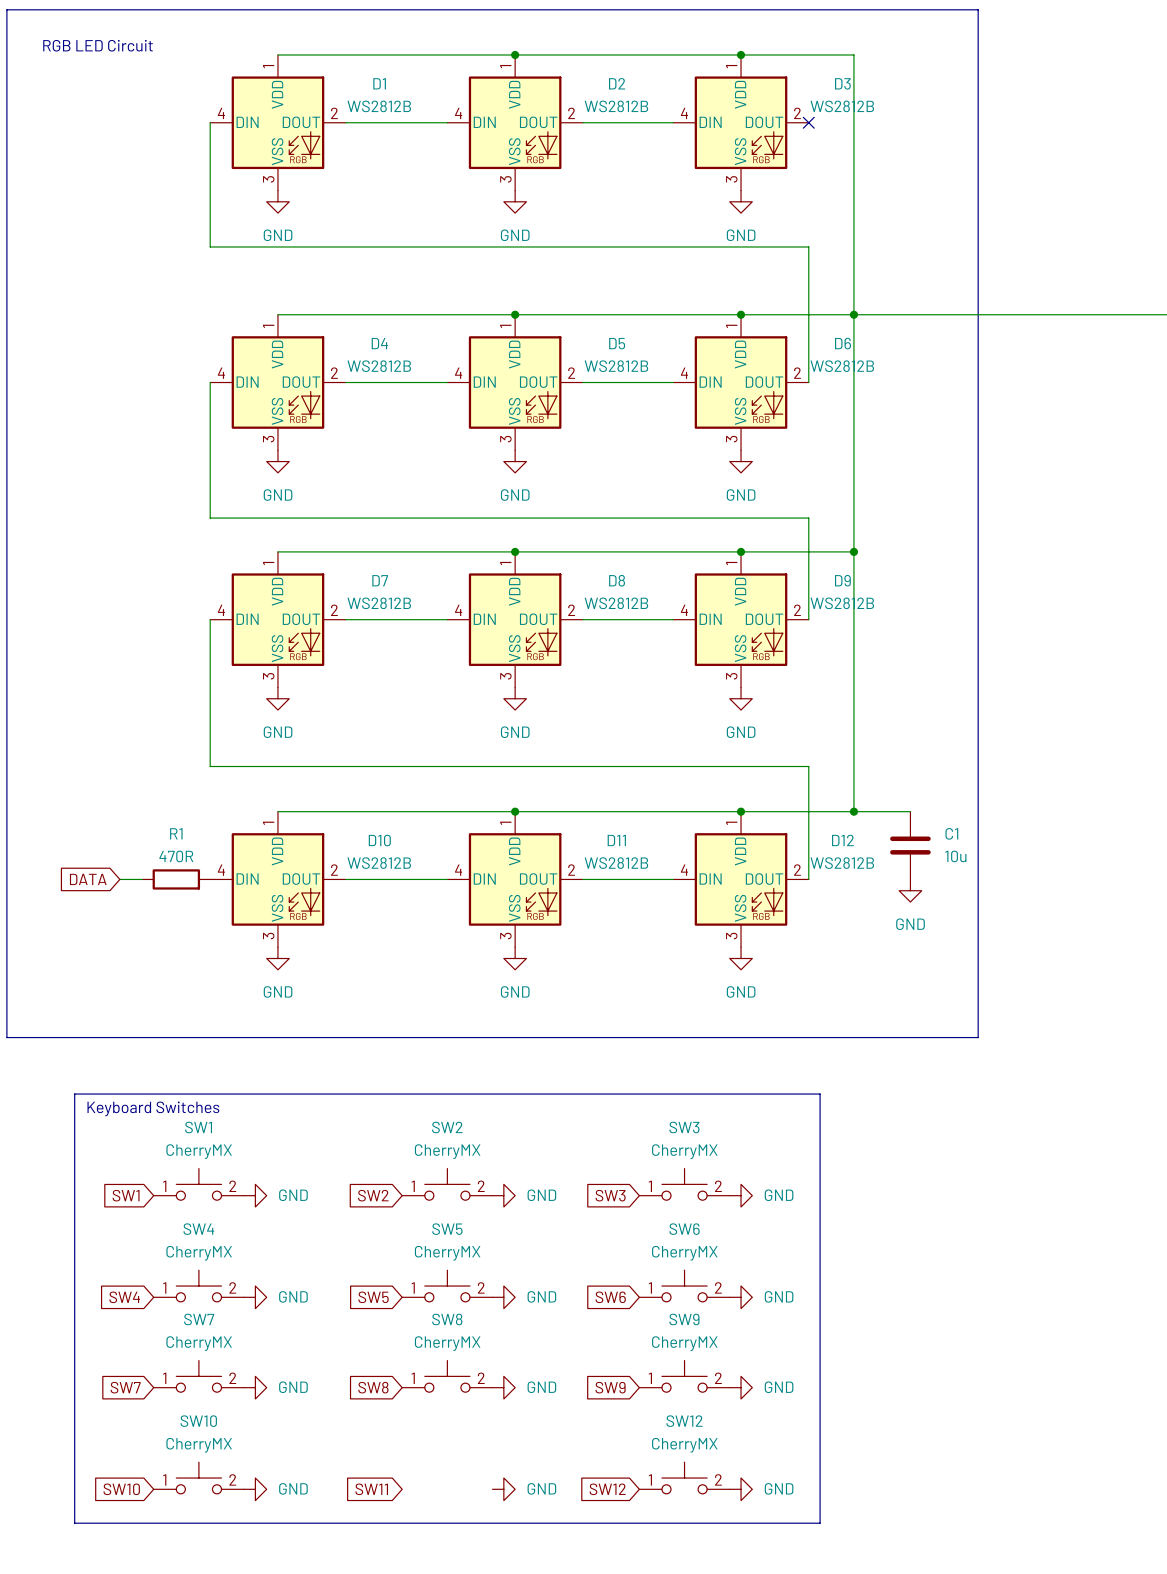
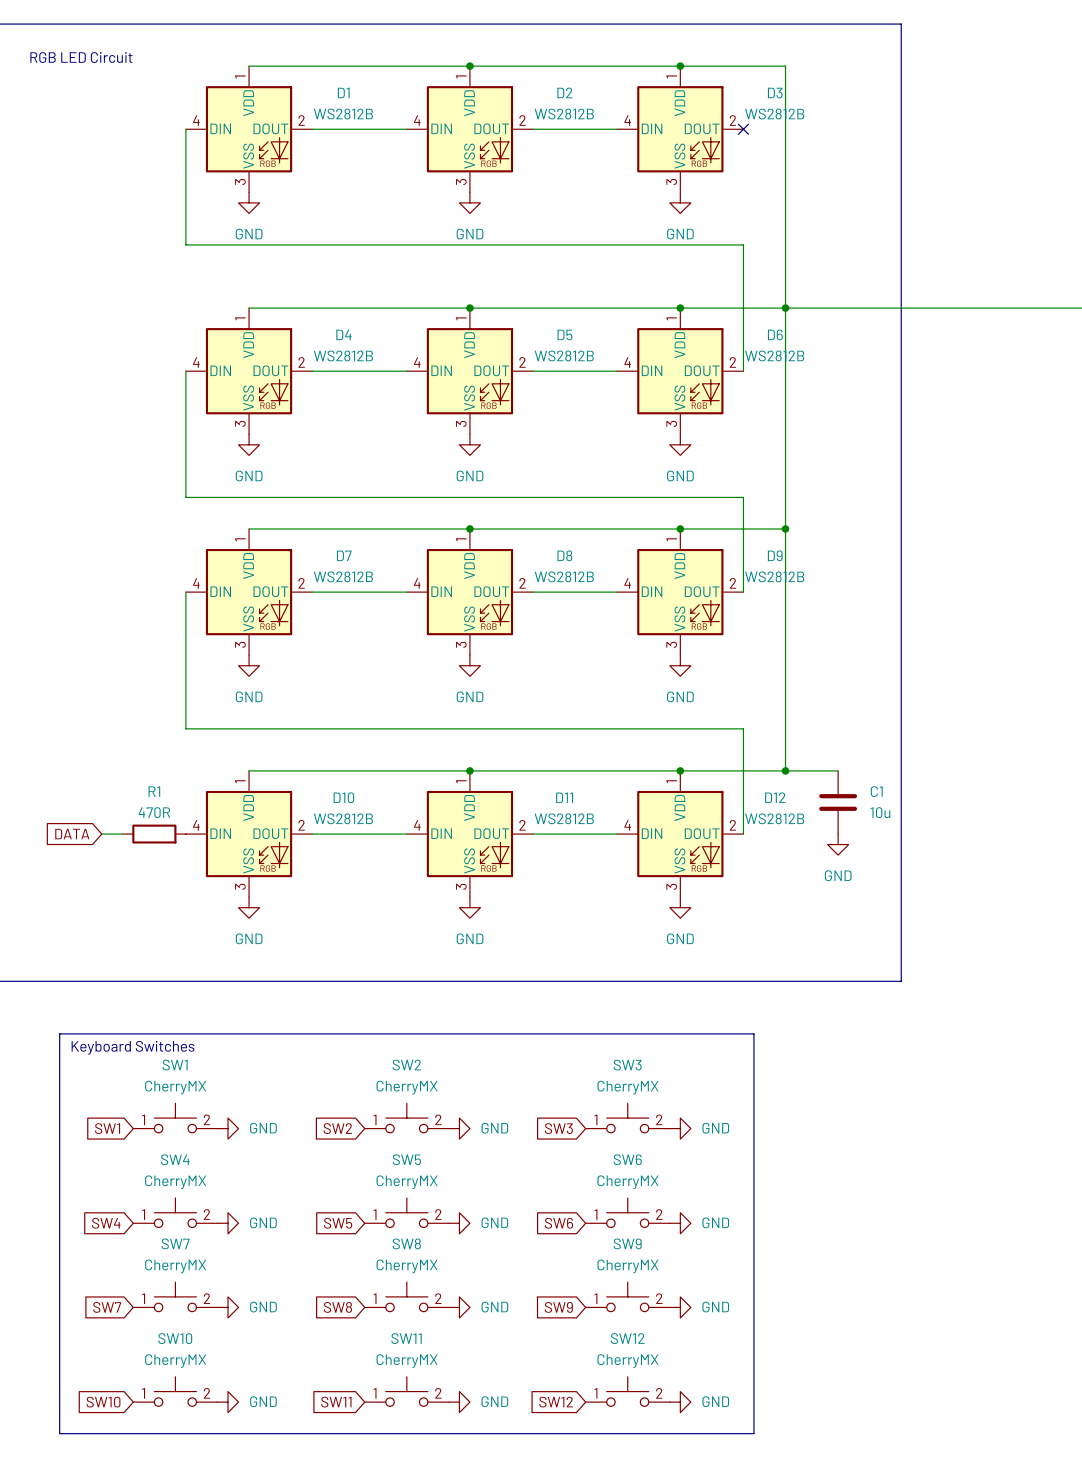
SW11: none -> CherryMX (406, 1391)

